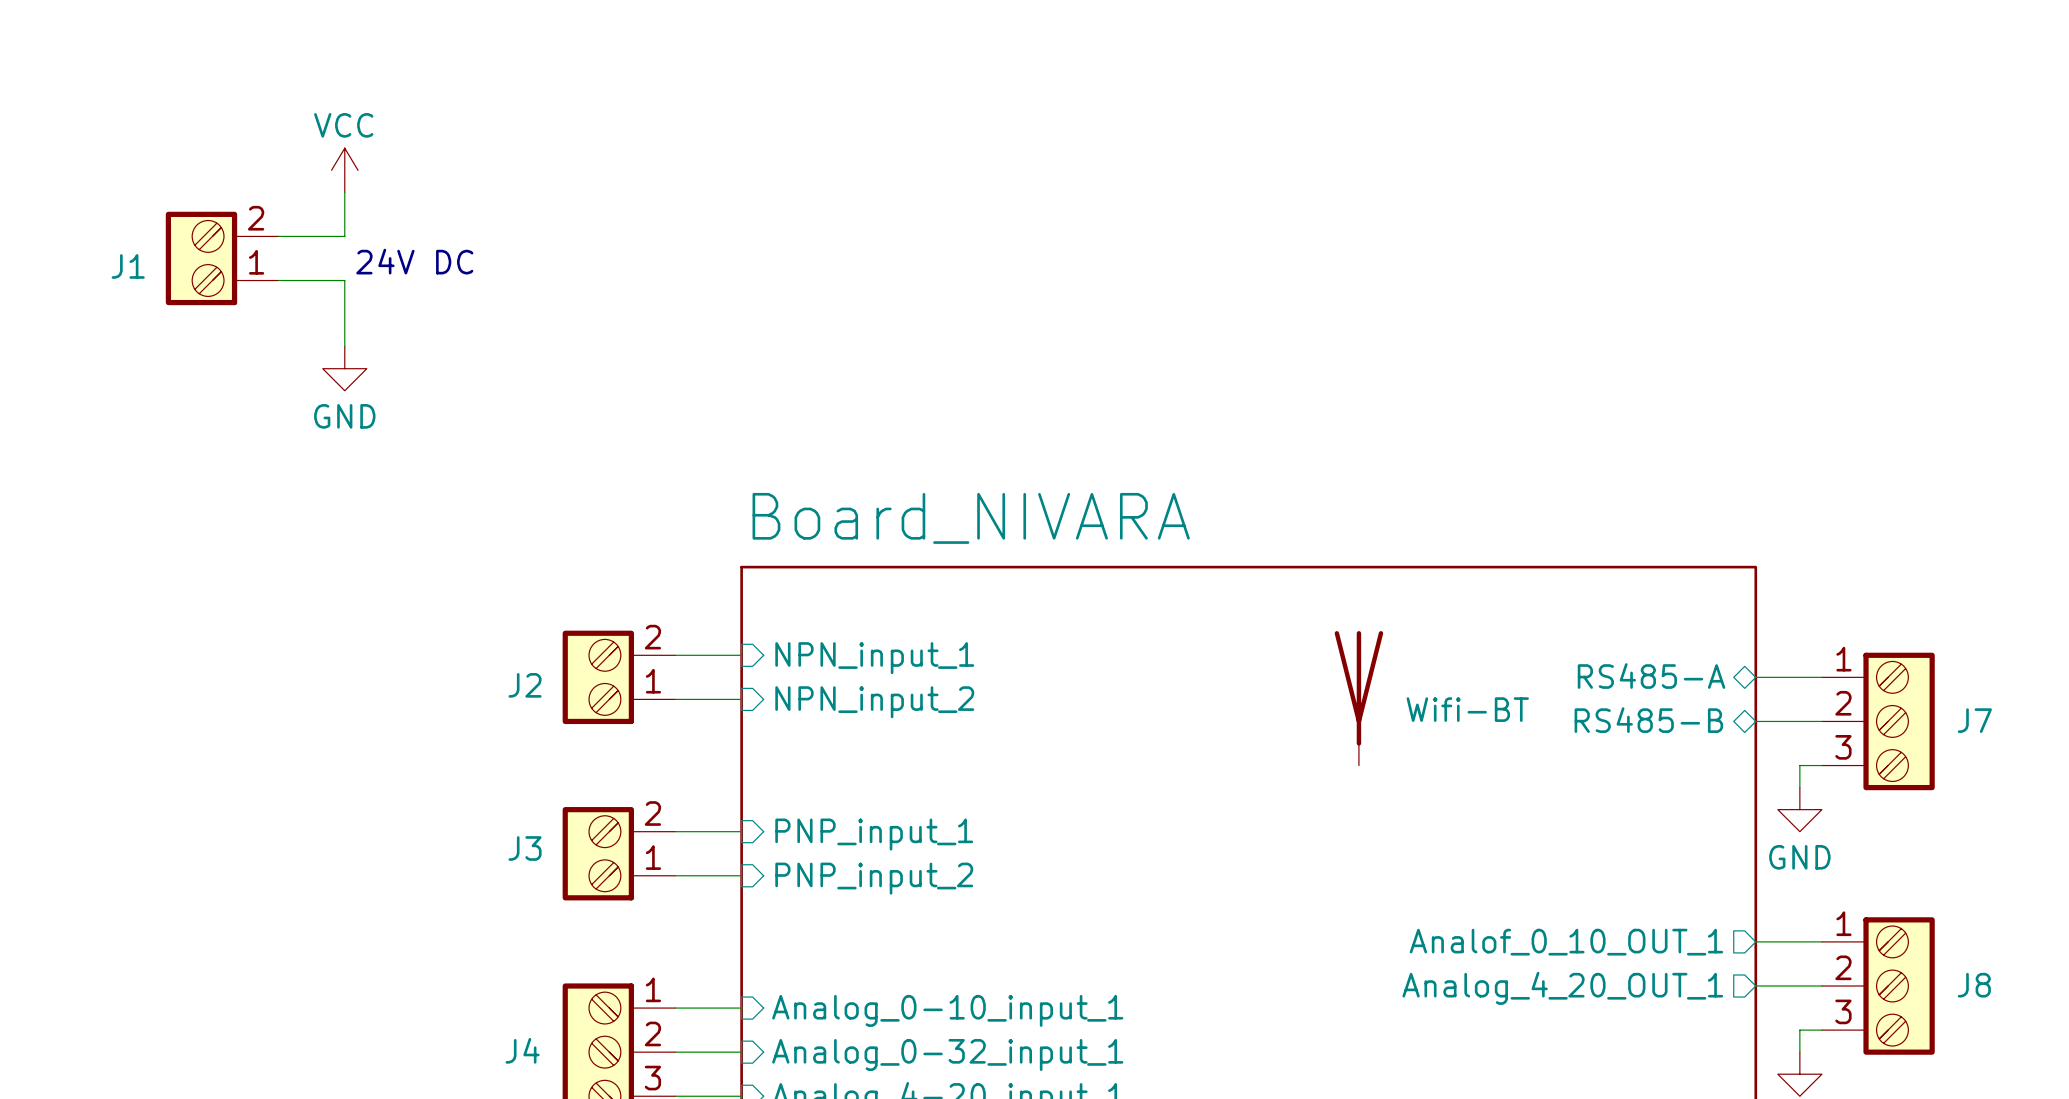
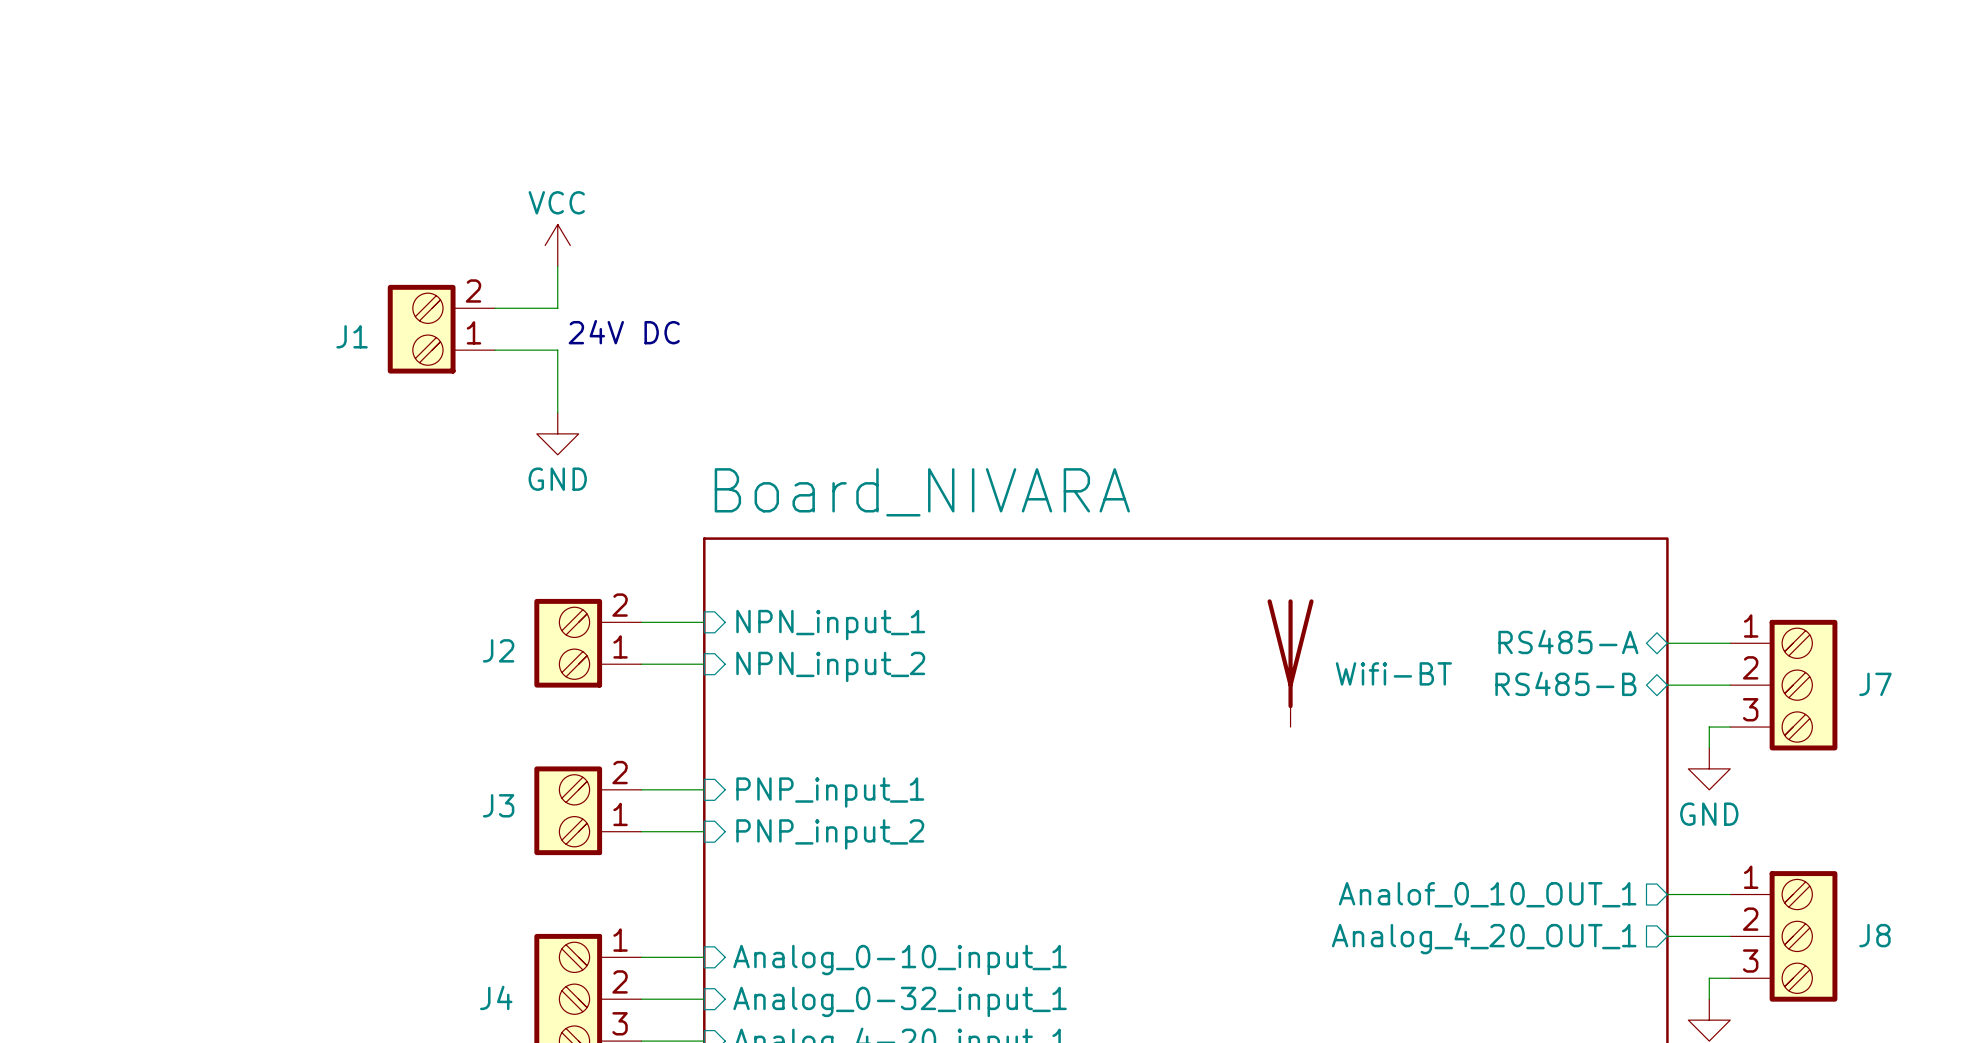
power symbol position: VCC (344, 170) -> VCC (557, 245)
wire: (344, 192) (344, 236) (278, 236) -> (557, 266) (557, 308) (494, 308)
J1 position: (222, 258) -> (441, 329)
text position: 24V DC (414, 261) -> 24V DC (624, 332)
wire: (278, 280) (344, 280) (344, 346) -> (494, 350) (557, 350) (557, 412)
power symbol position: GND (344, 368) -> GND (557, 433)

